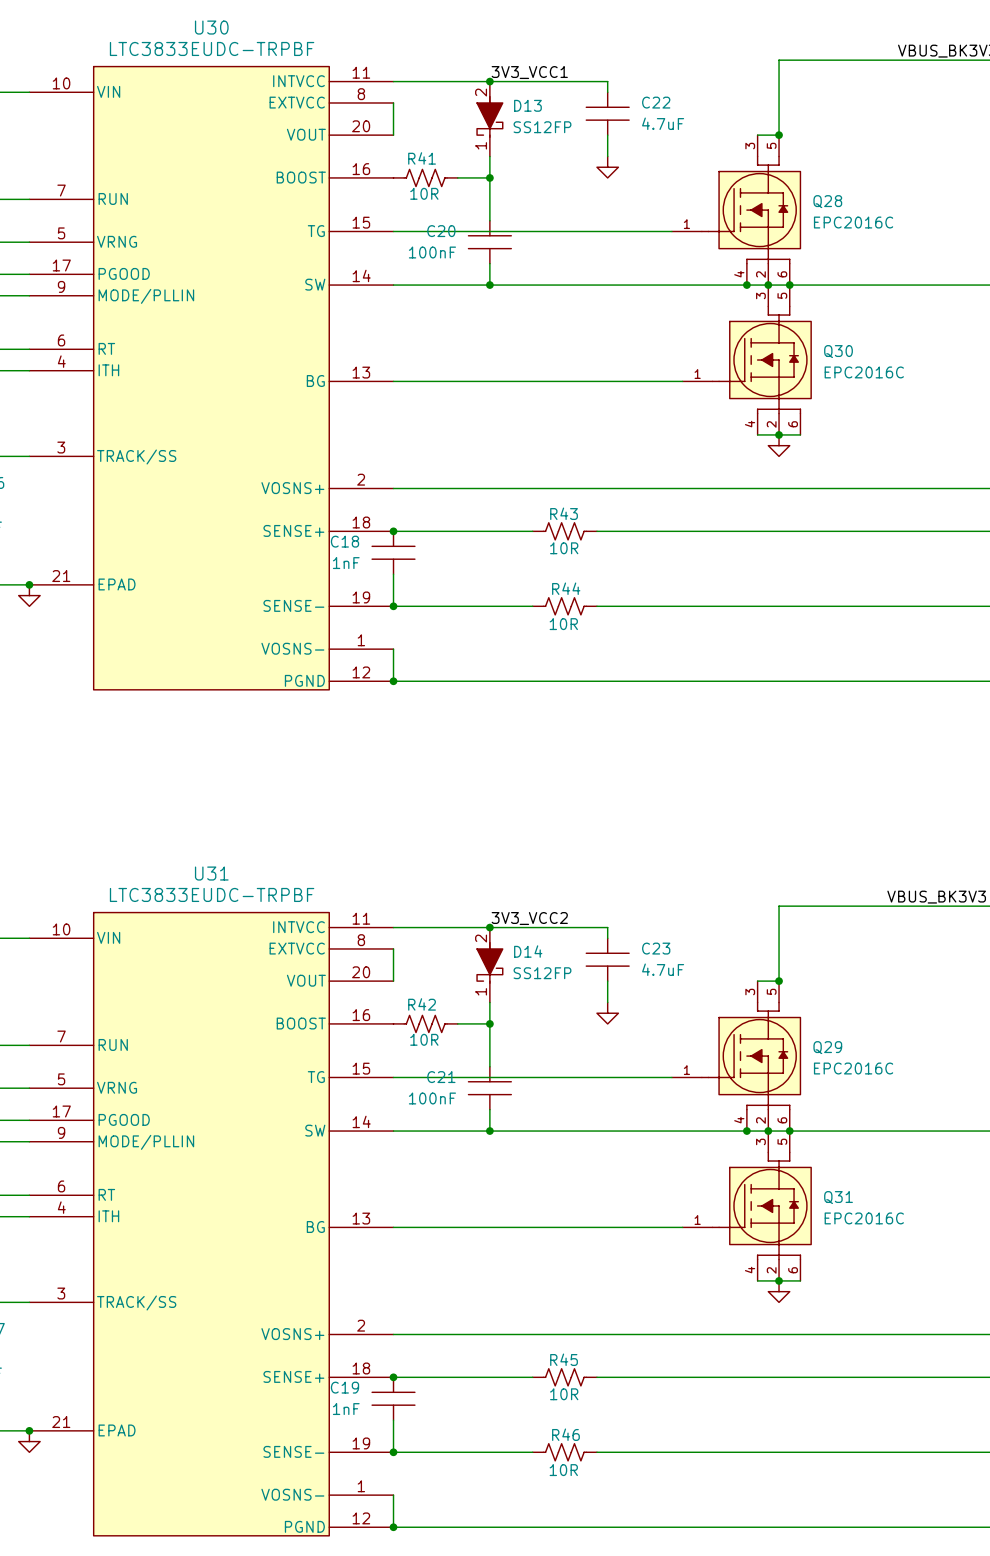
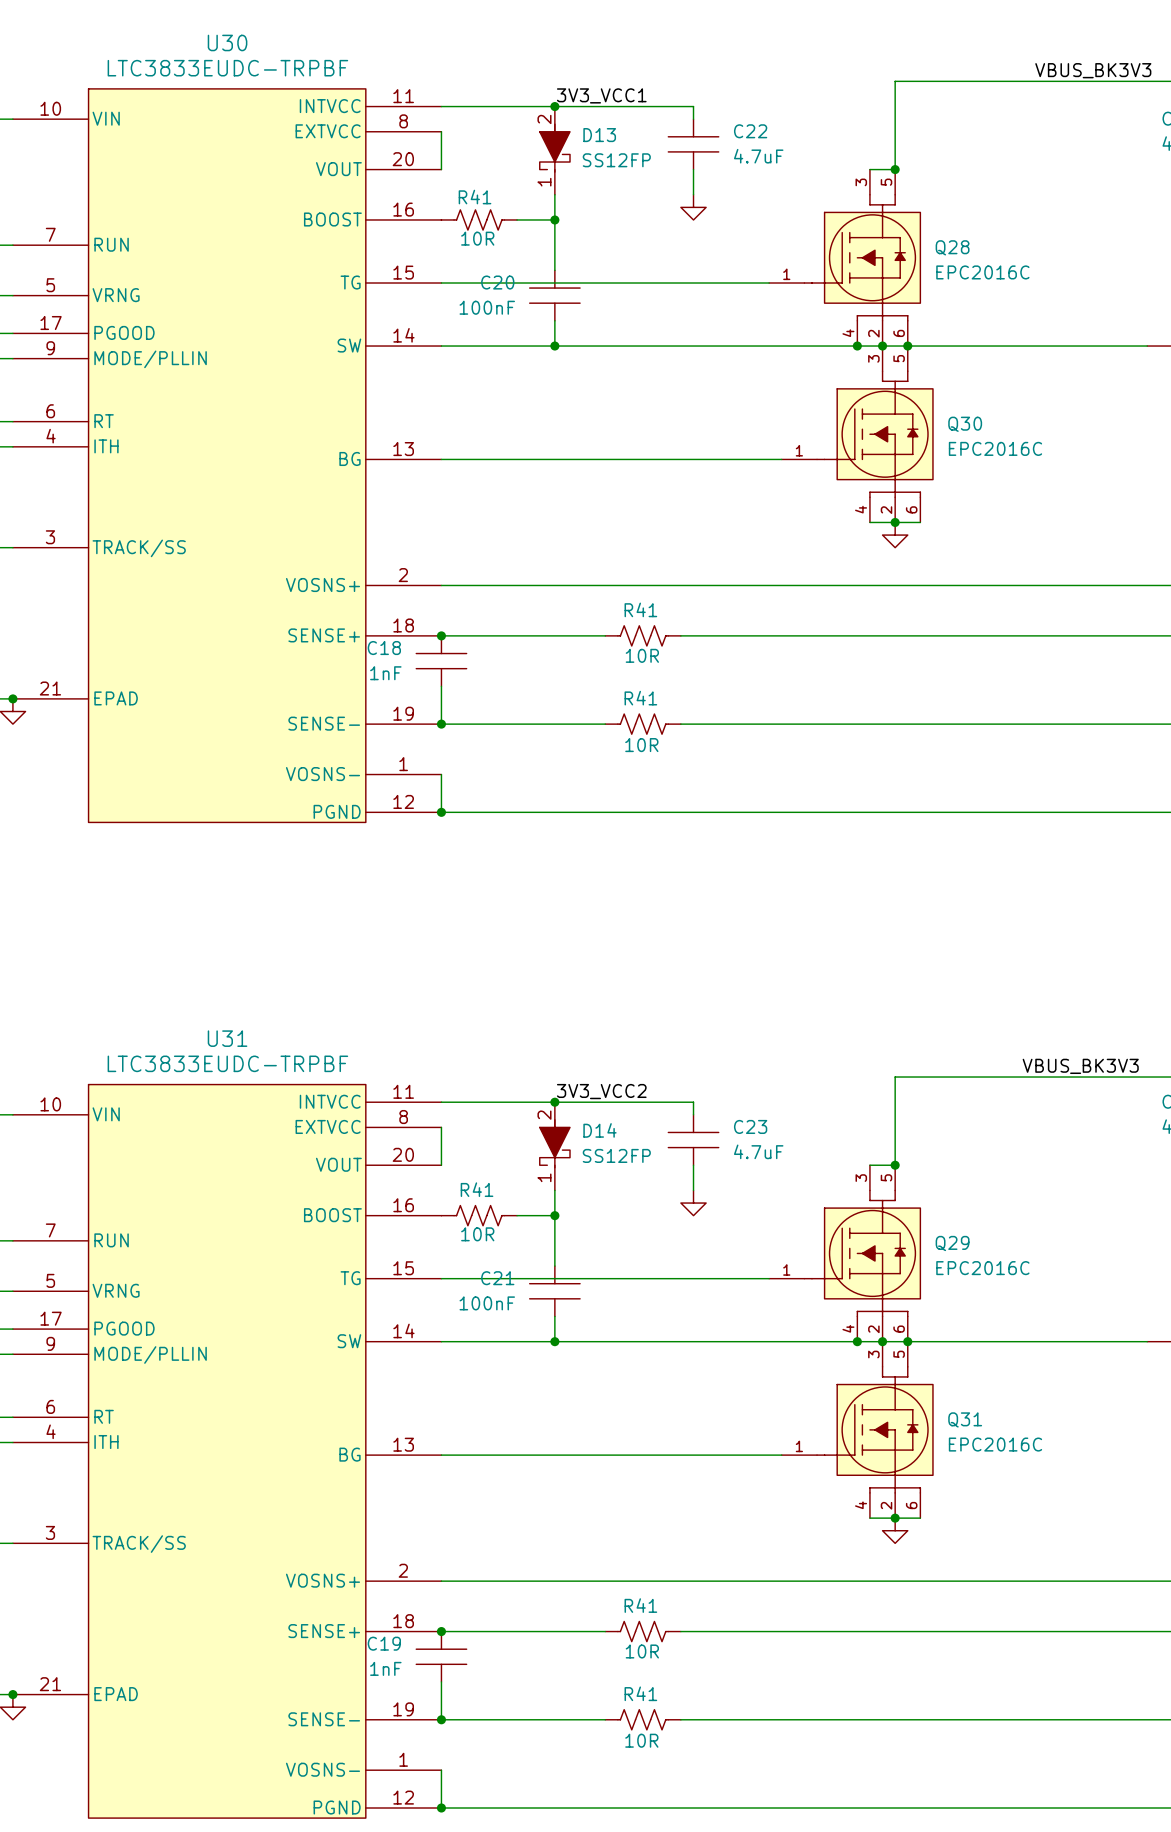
R43 name: R43 (564, 513) -> R41 (640, 609)
R44 name: R44 (566, 588) -> R41 (640, 698)
R42 name: R42 (422, 1004) -> R41 (477, 1189)
R45 name: R45 (564, 1359) -> R41 (640, 1605)
R46 name: R46 (565, 1434) -> R41 (640, 1693)

